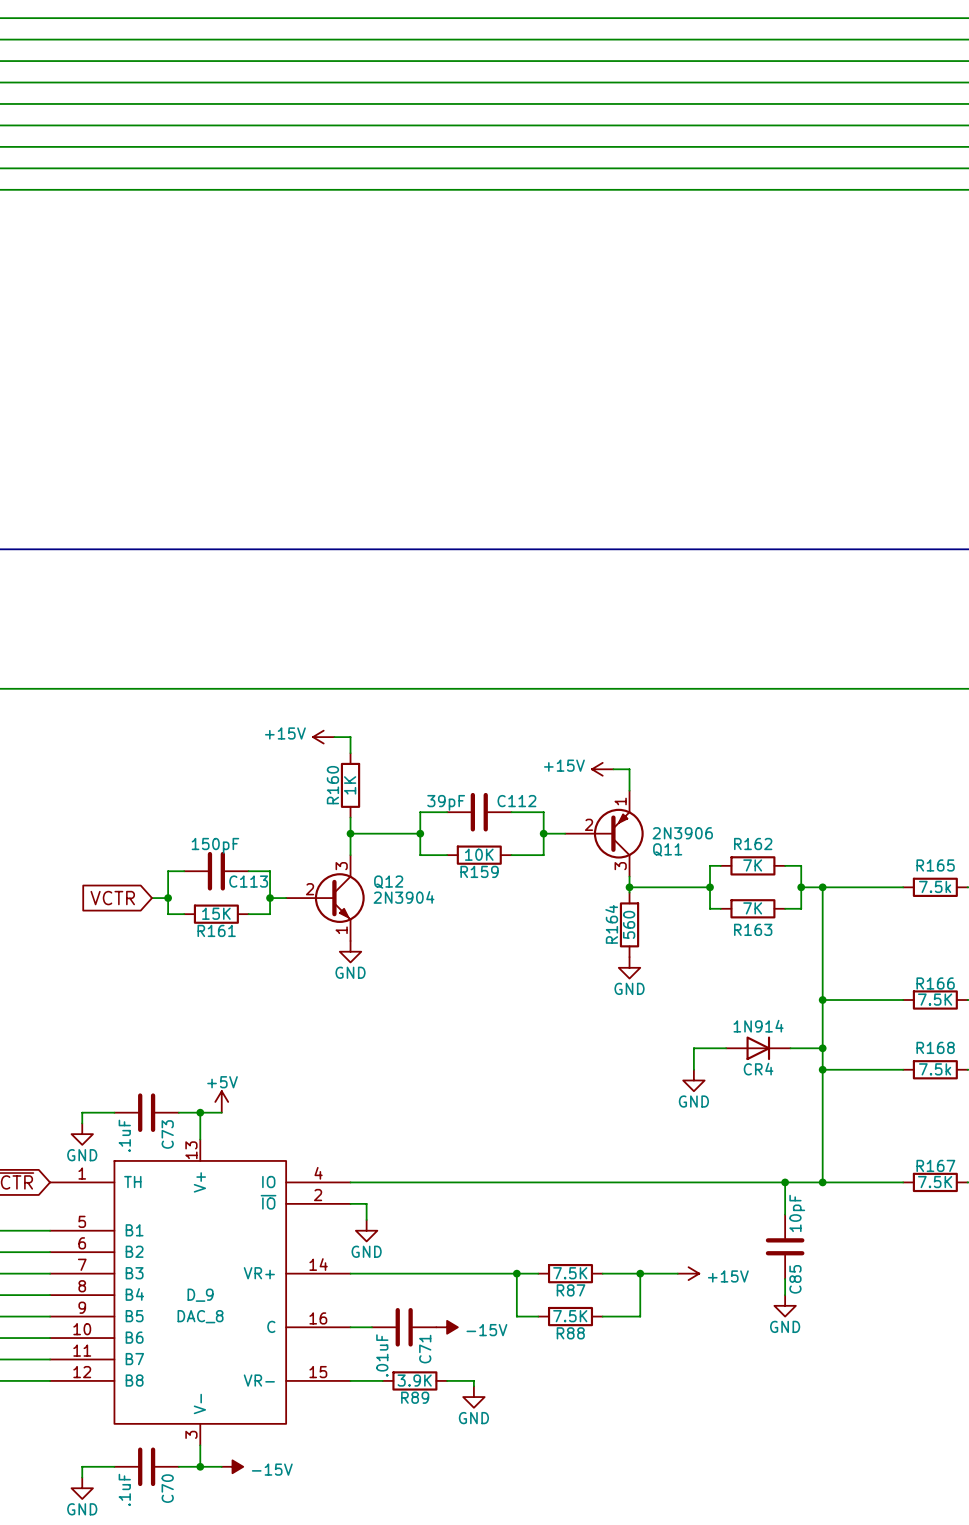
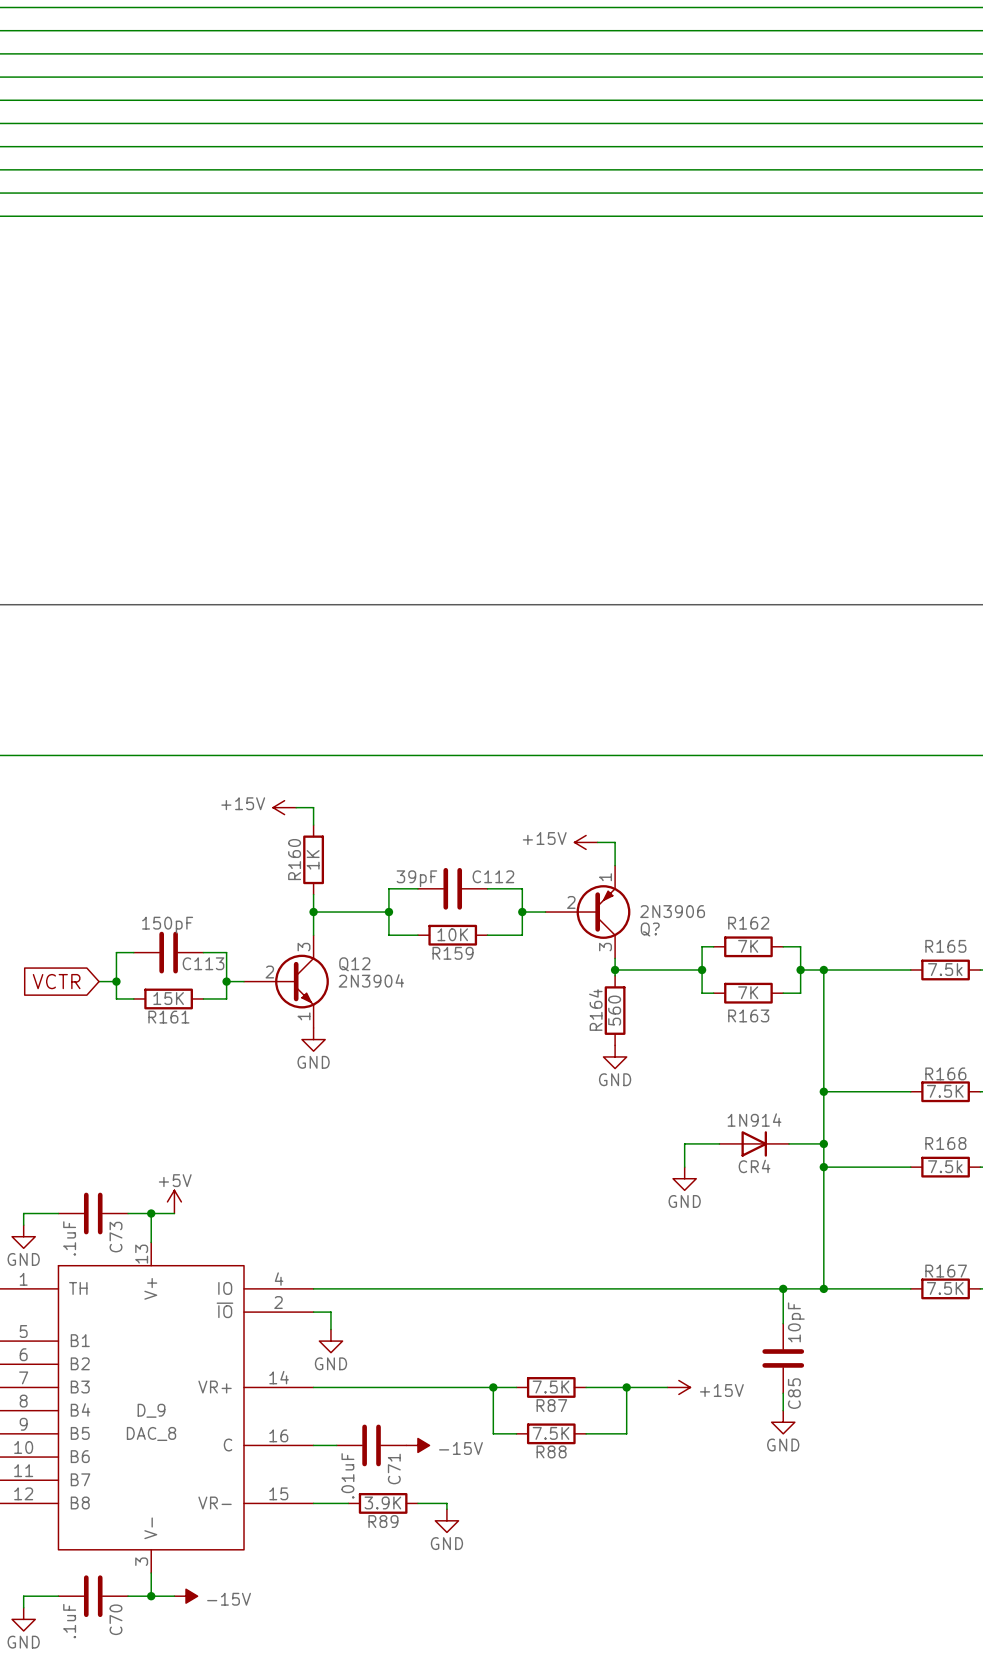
Q11 name: Q11 (667, 849) -> Q? (650, 929)

